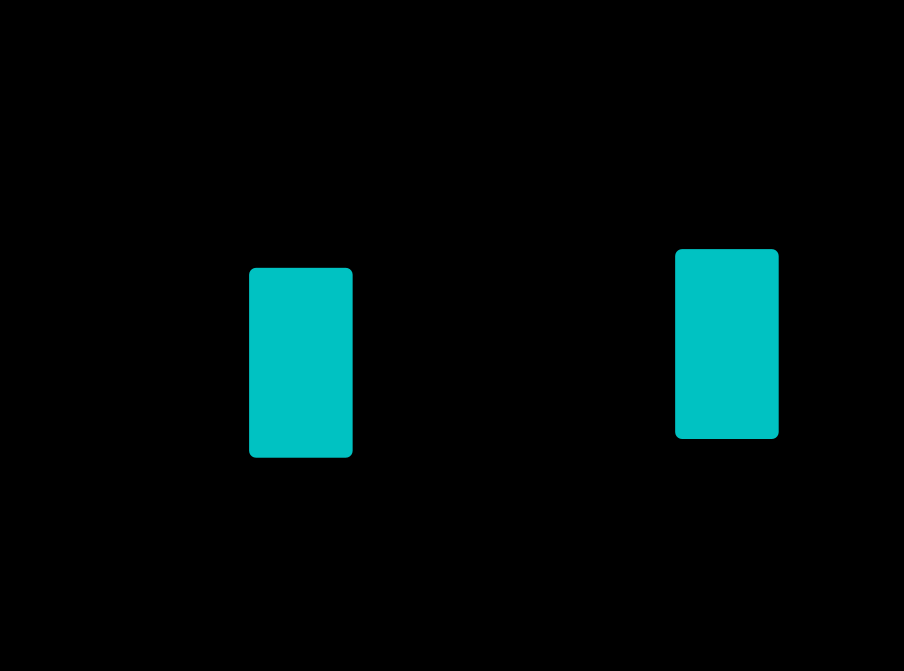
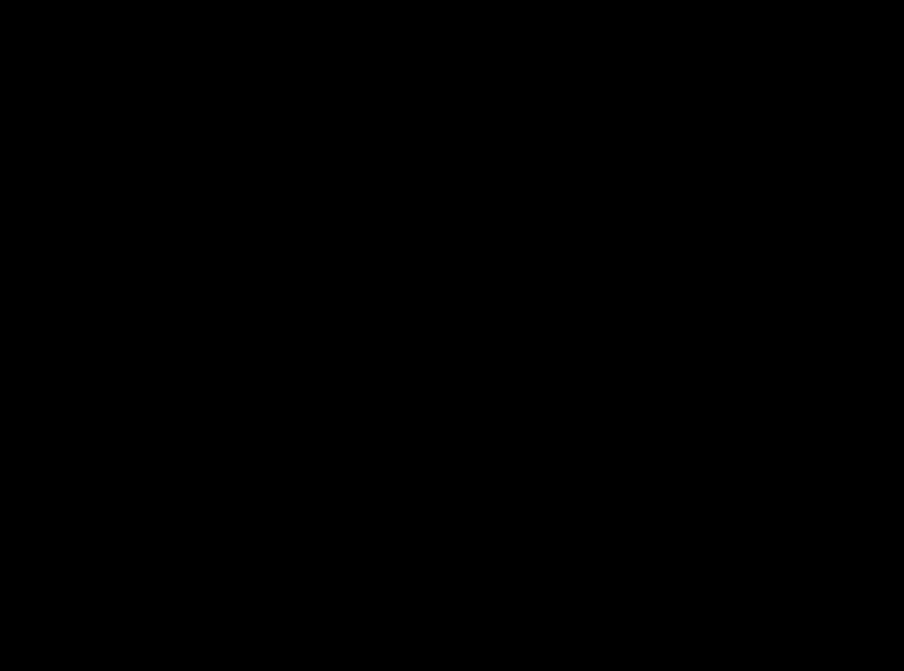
drawing: [675, 249, 779, 440] -> none
drawing: [249, 267, 353, 458] -> none

